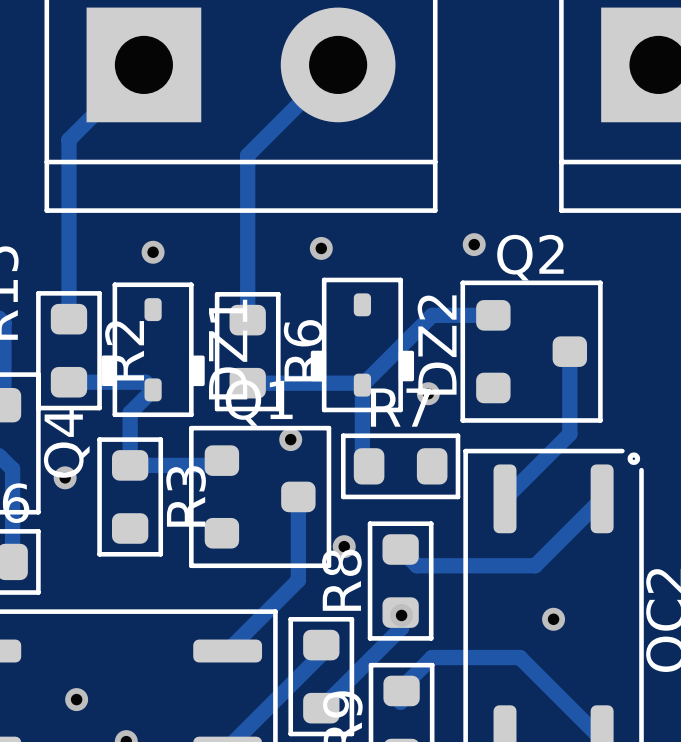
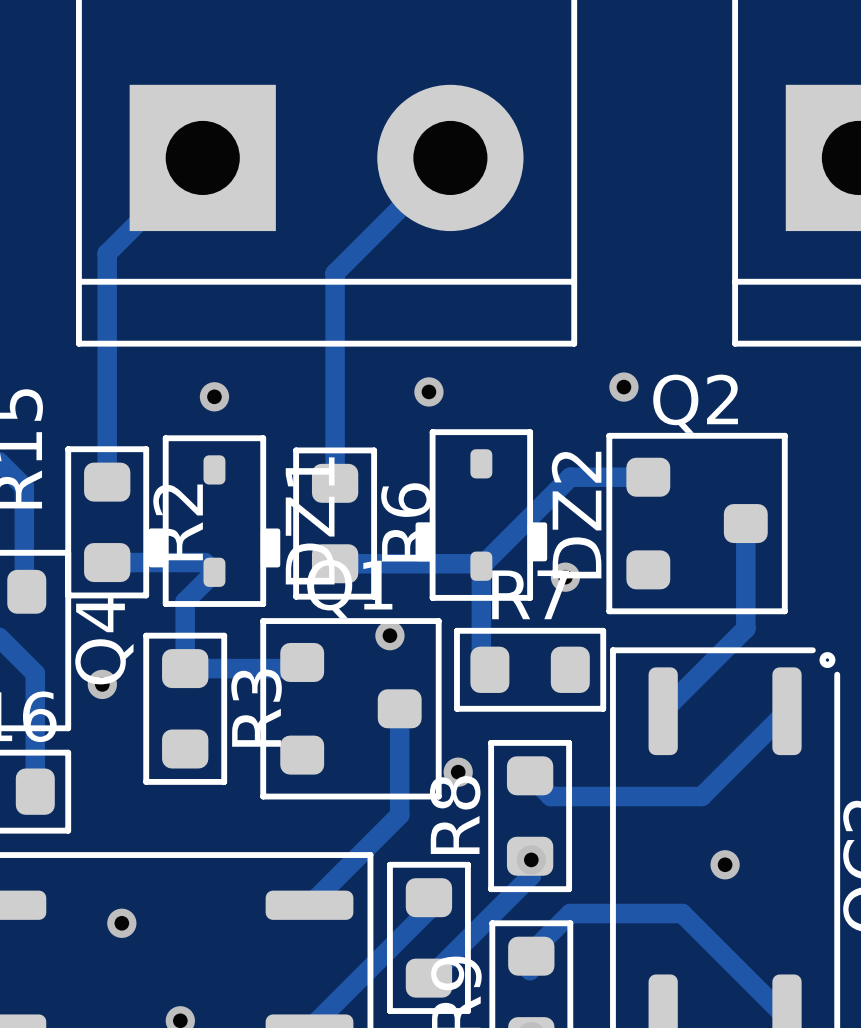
via position: (76, 699) -> (121, 923)

